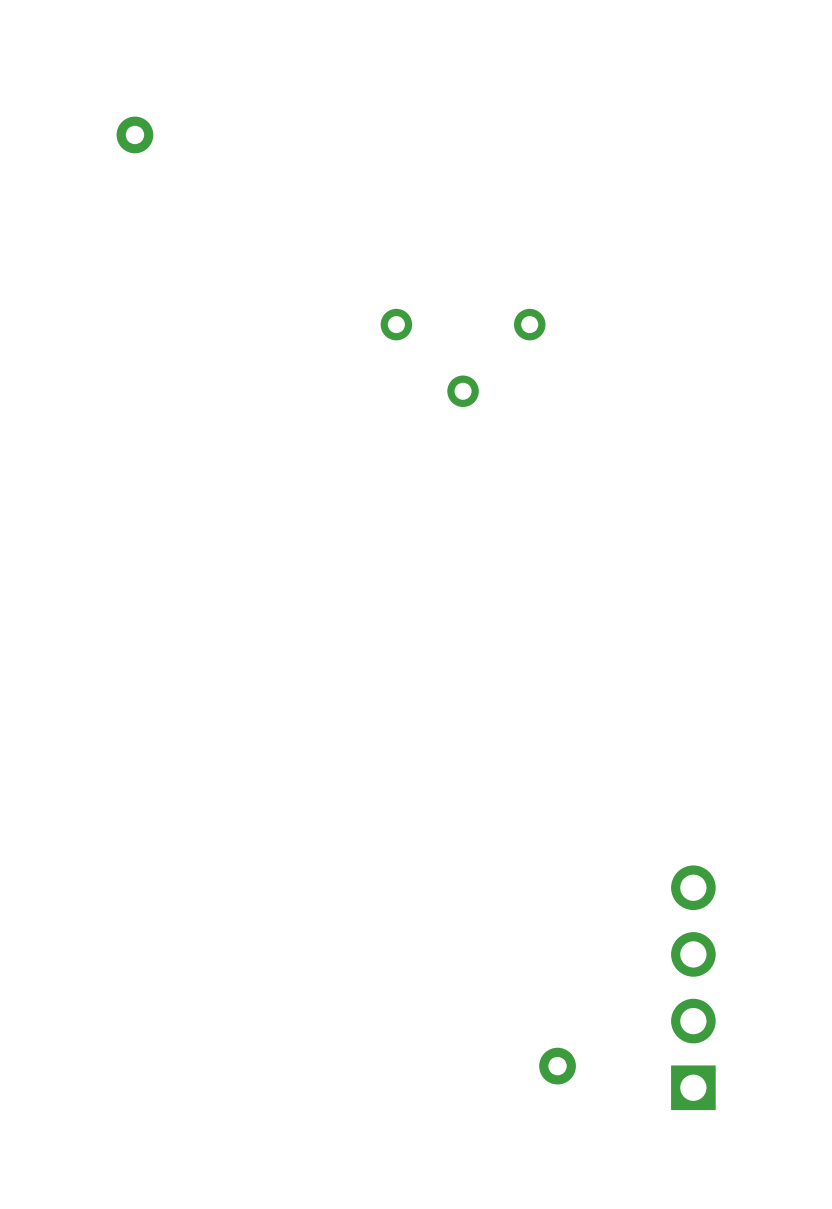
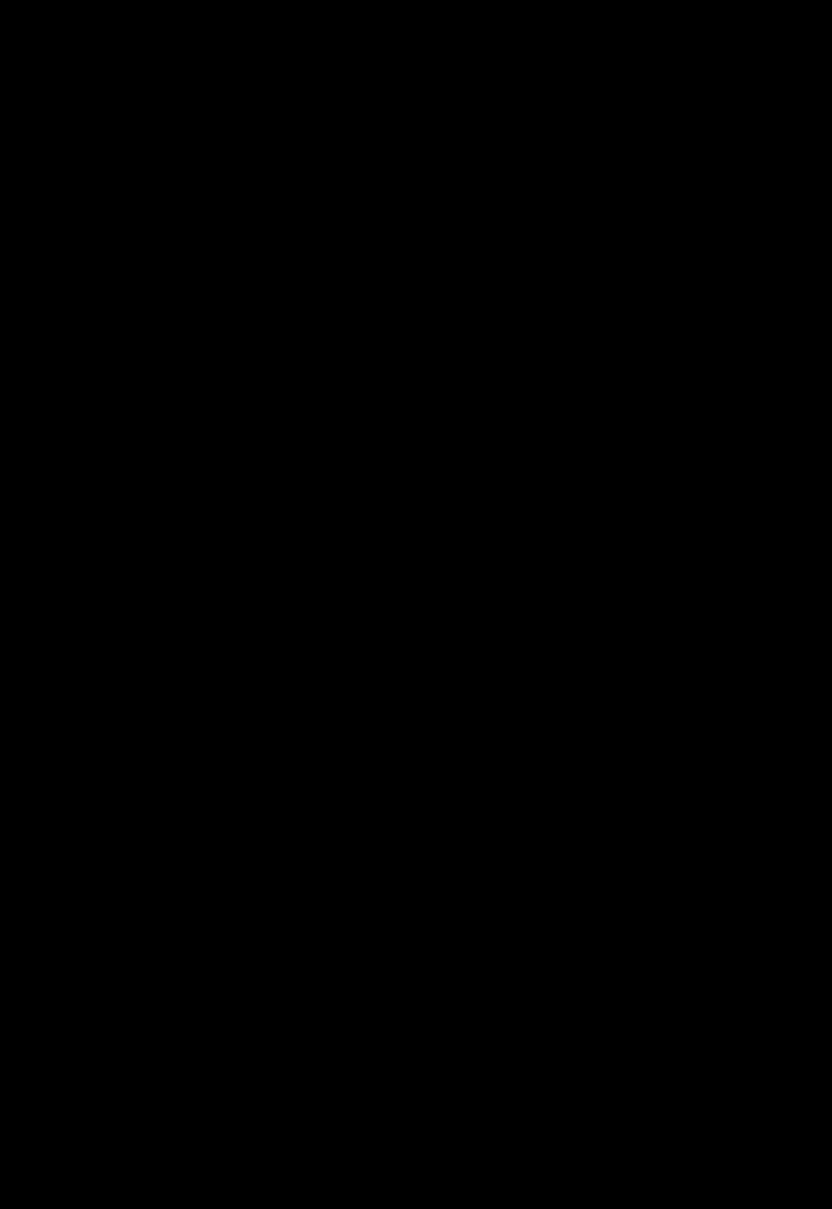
part: (134, 134) -> none
part: (463, 357) -> none
part: (693, 987) -> none
part: (557, 1066) -> none

